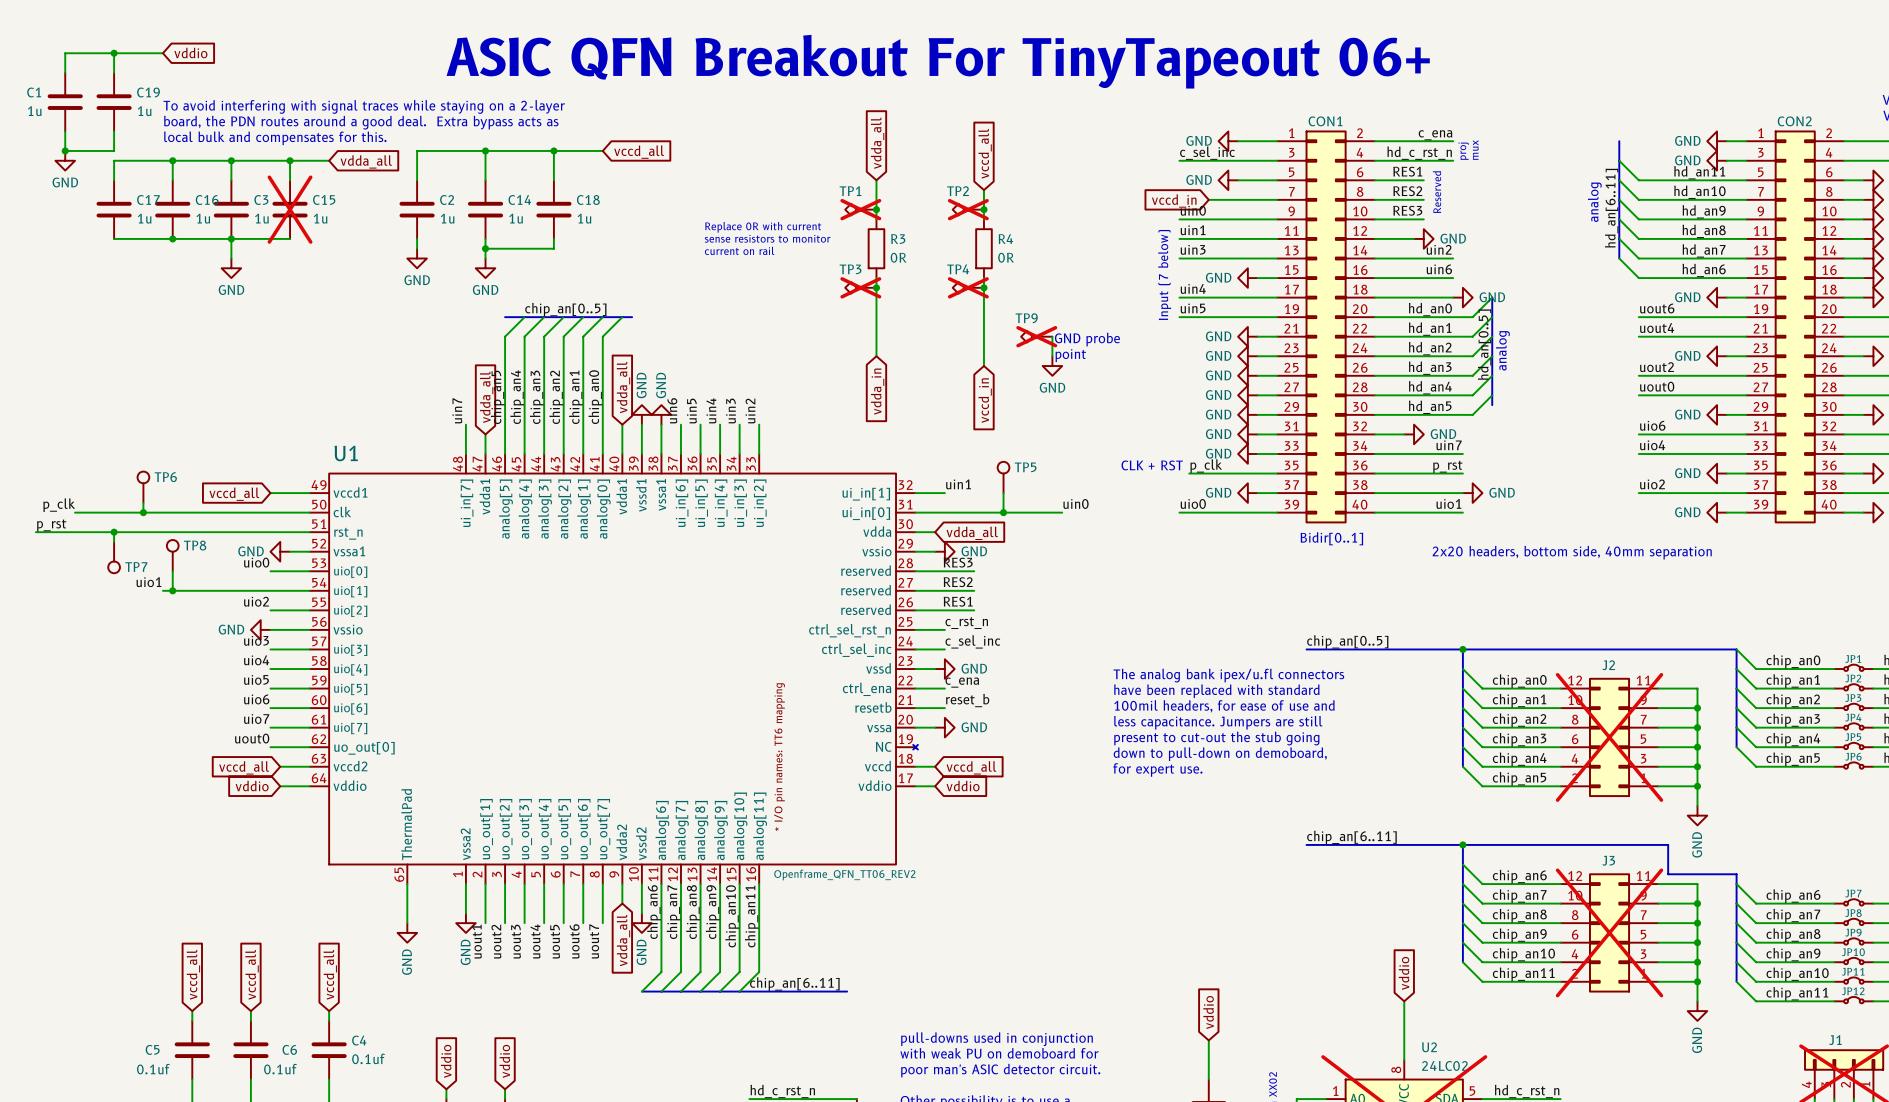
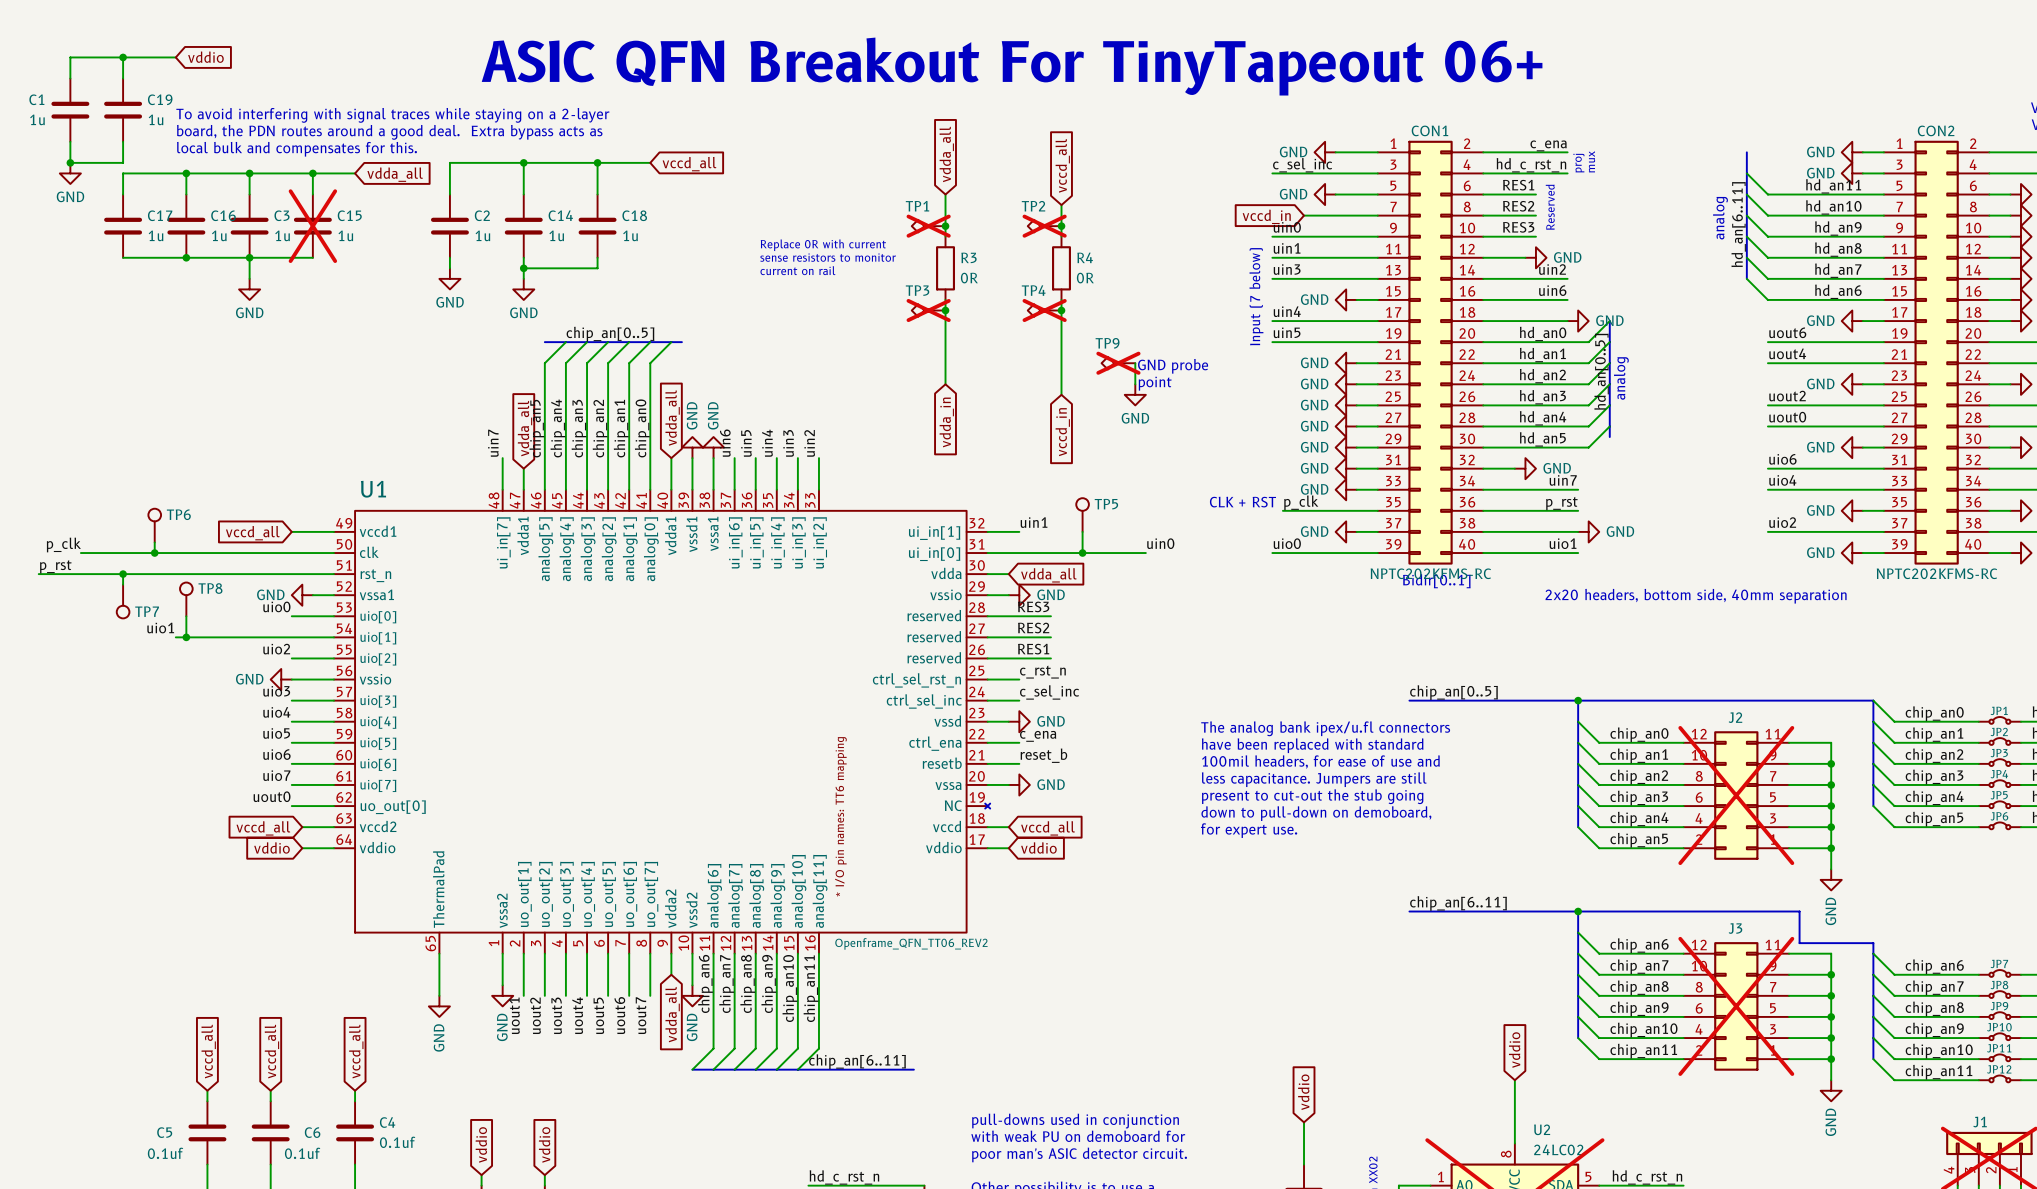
CON1 value: none -> NPTC202KFMS-RC (1430, 573)
CON2 value: none -> NPTC202KFMS-RC (1936, 573)

